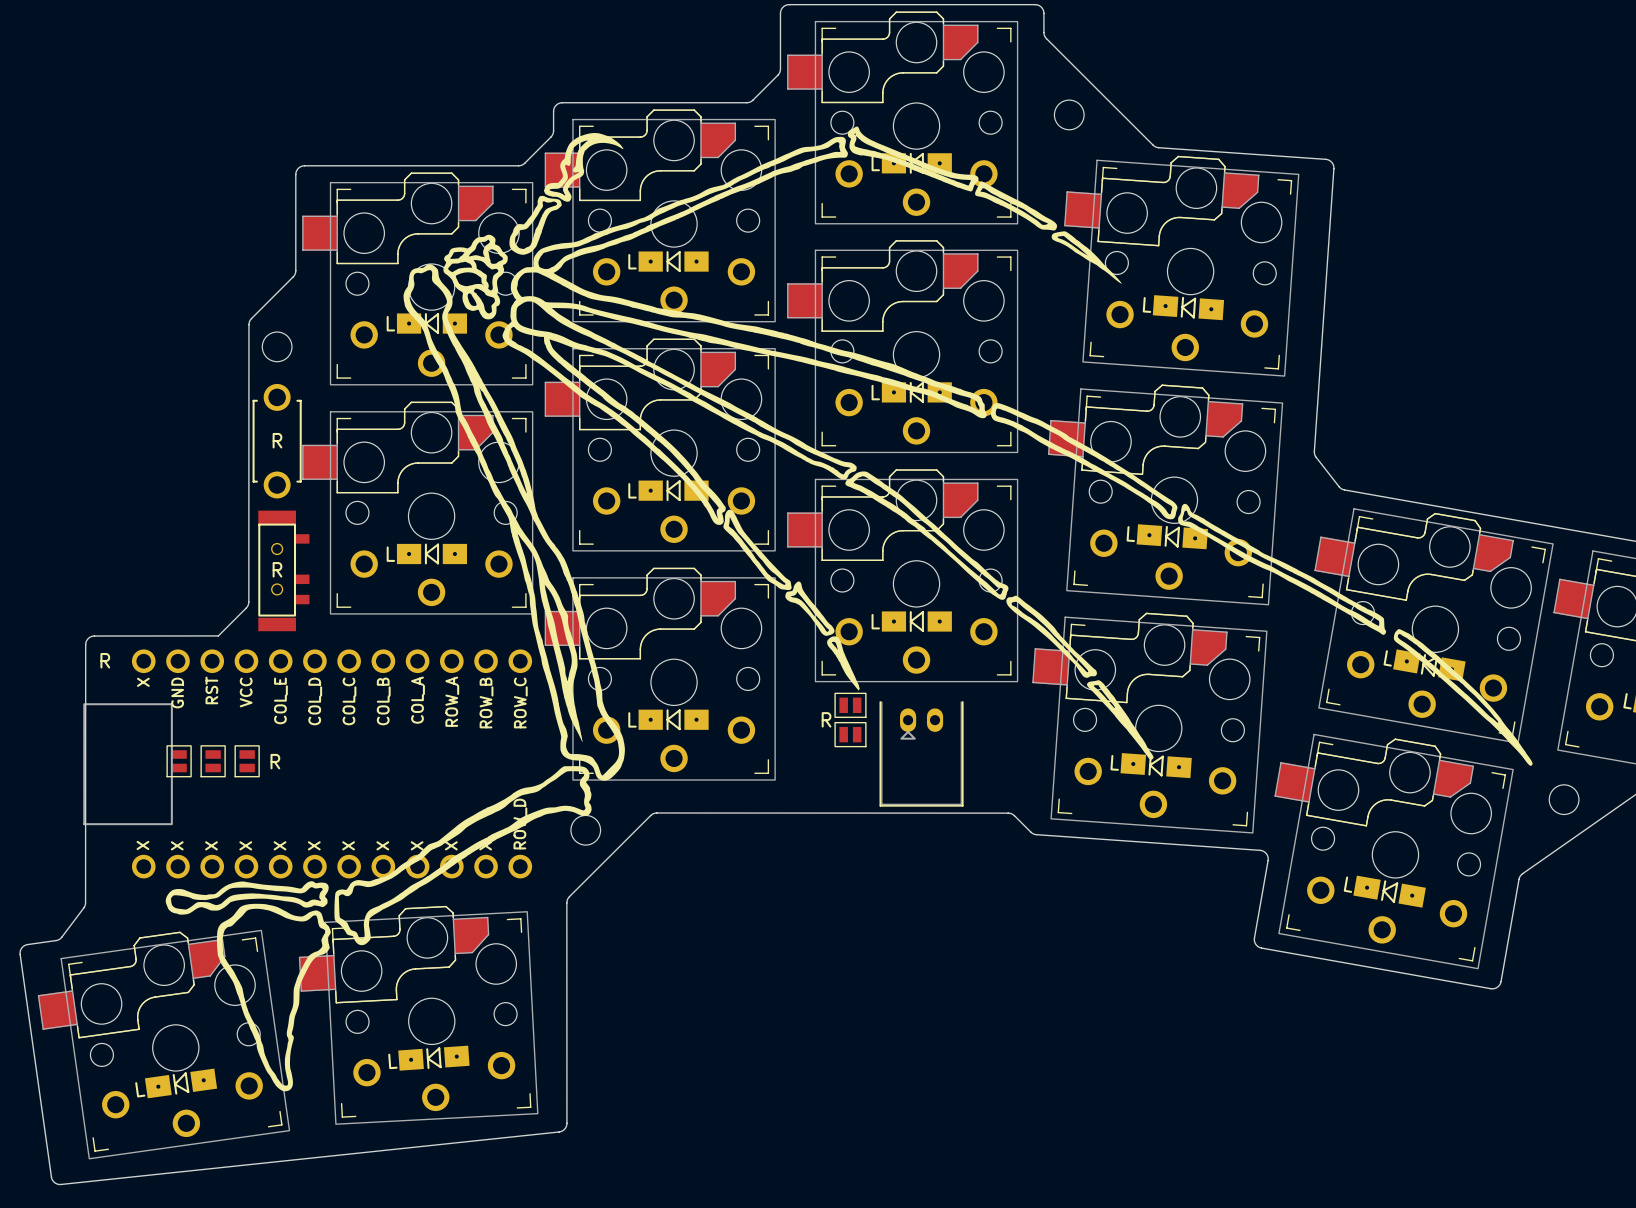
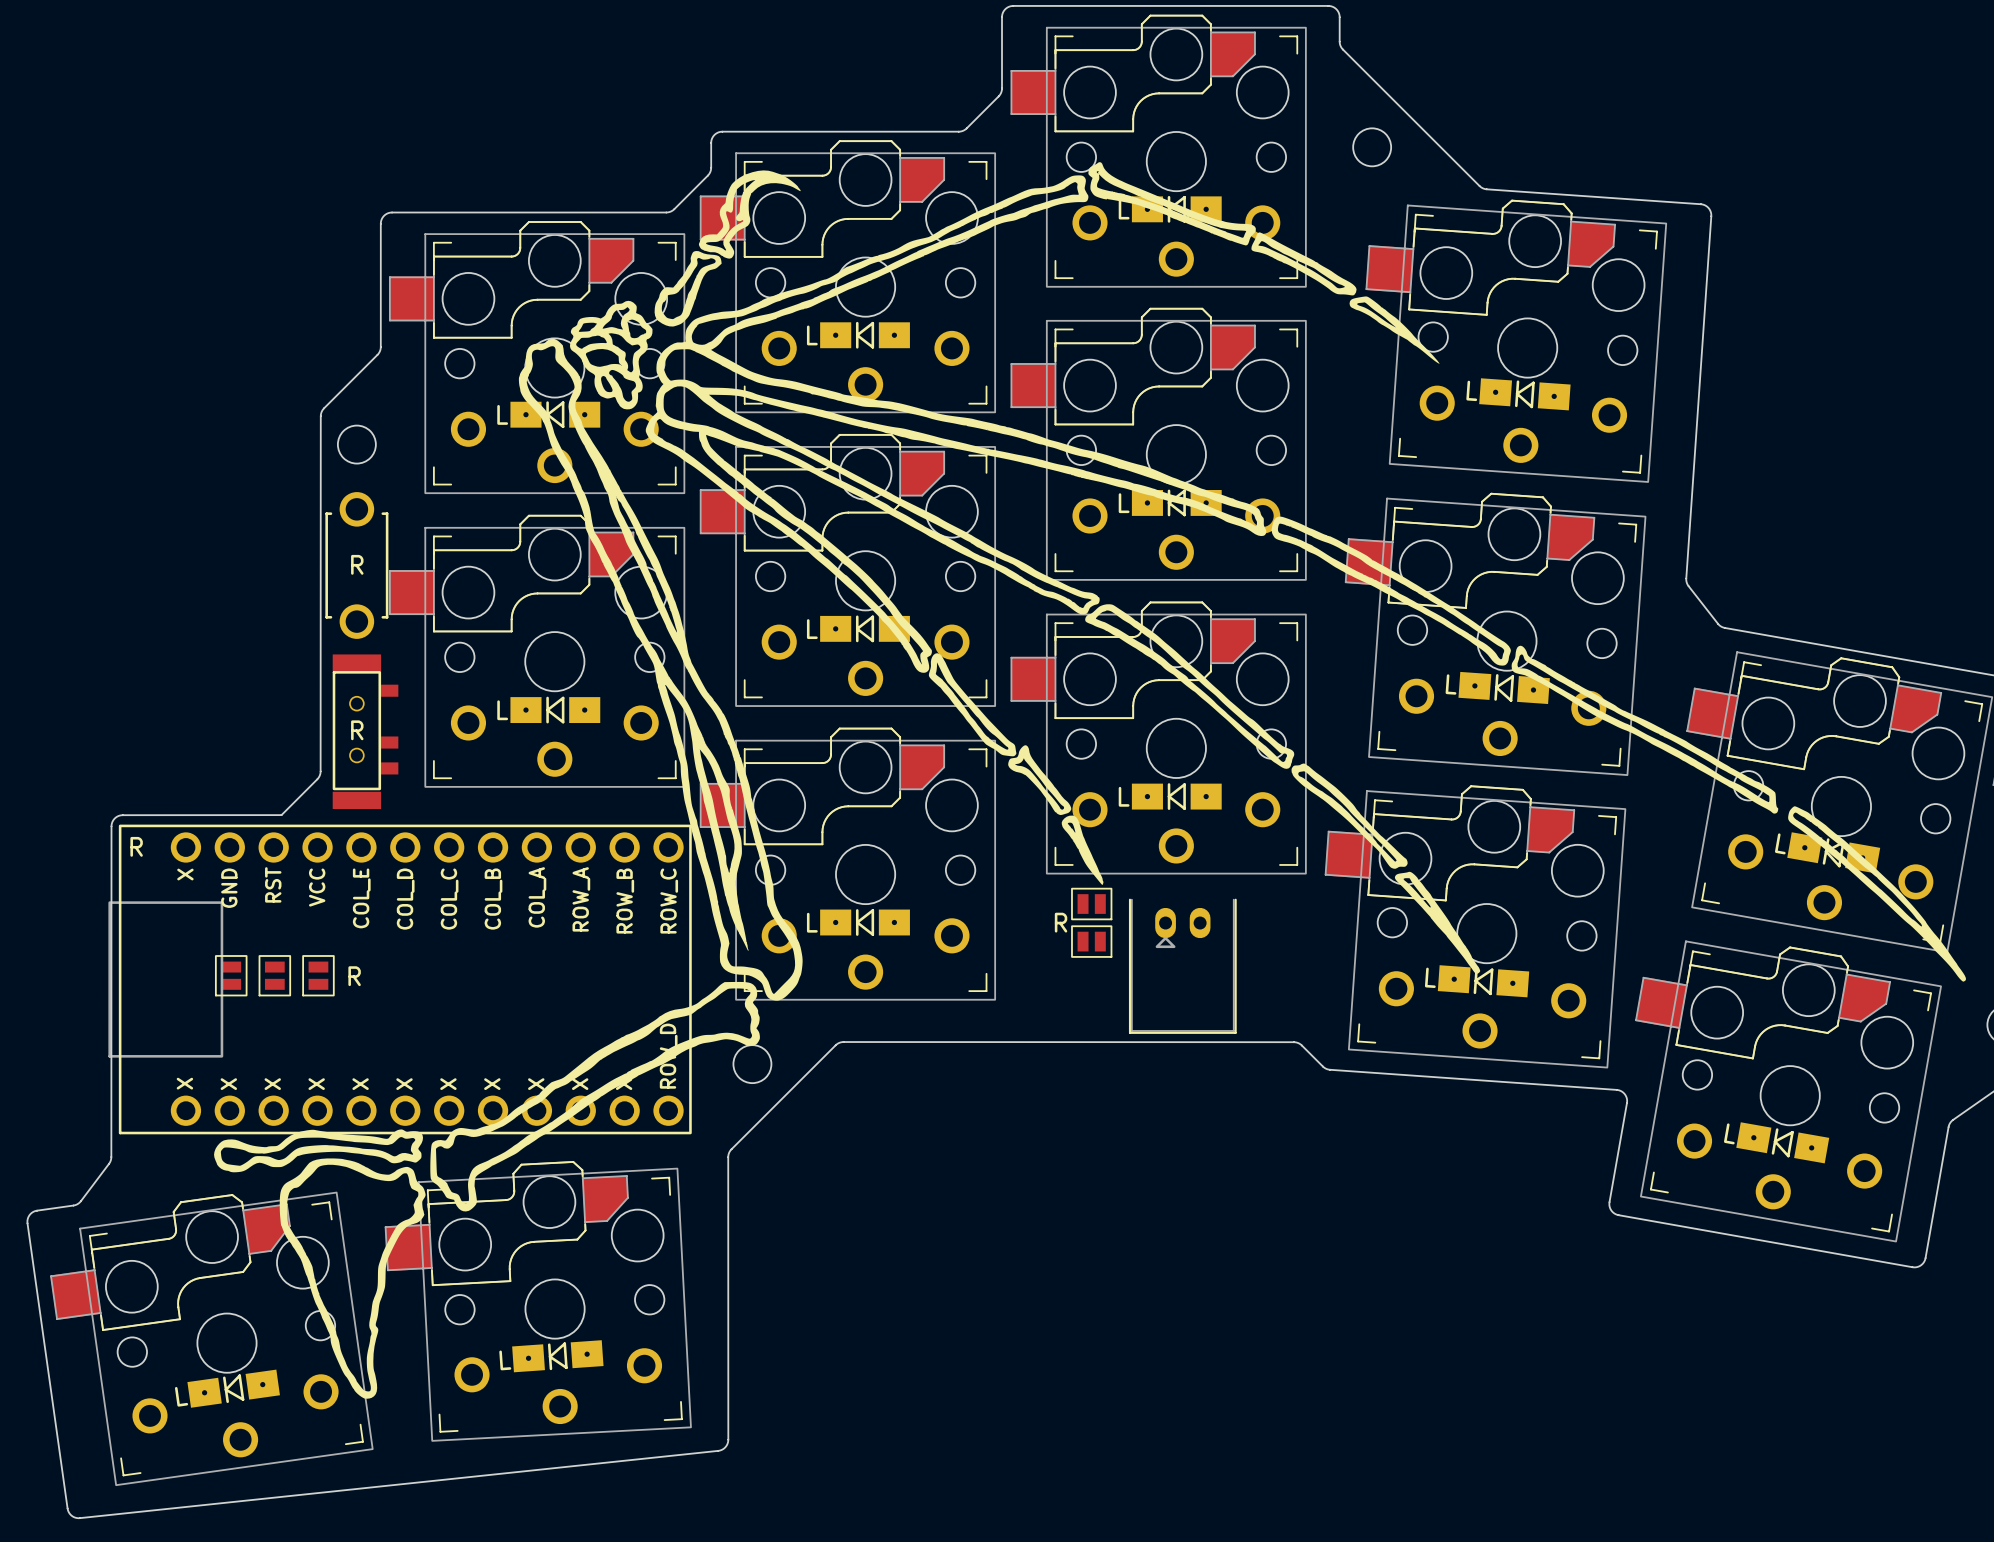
part footprint: [83, 649, 533, 879] -> [108, 824, 692, 1135]

